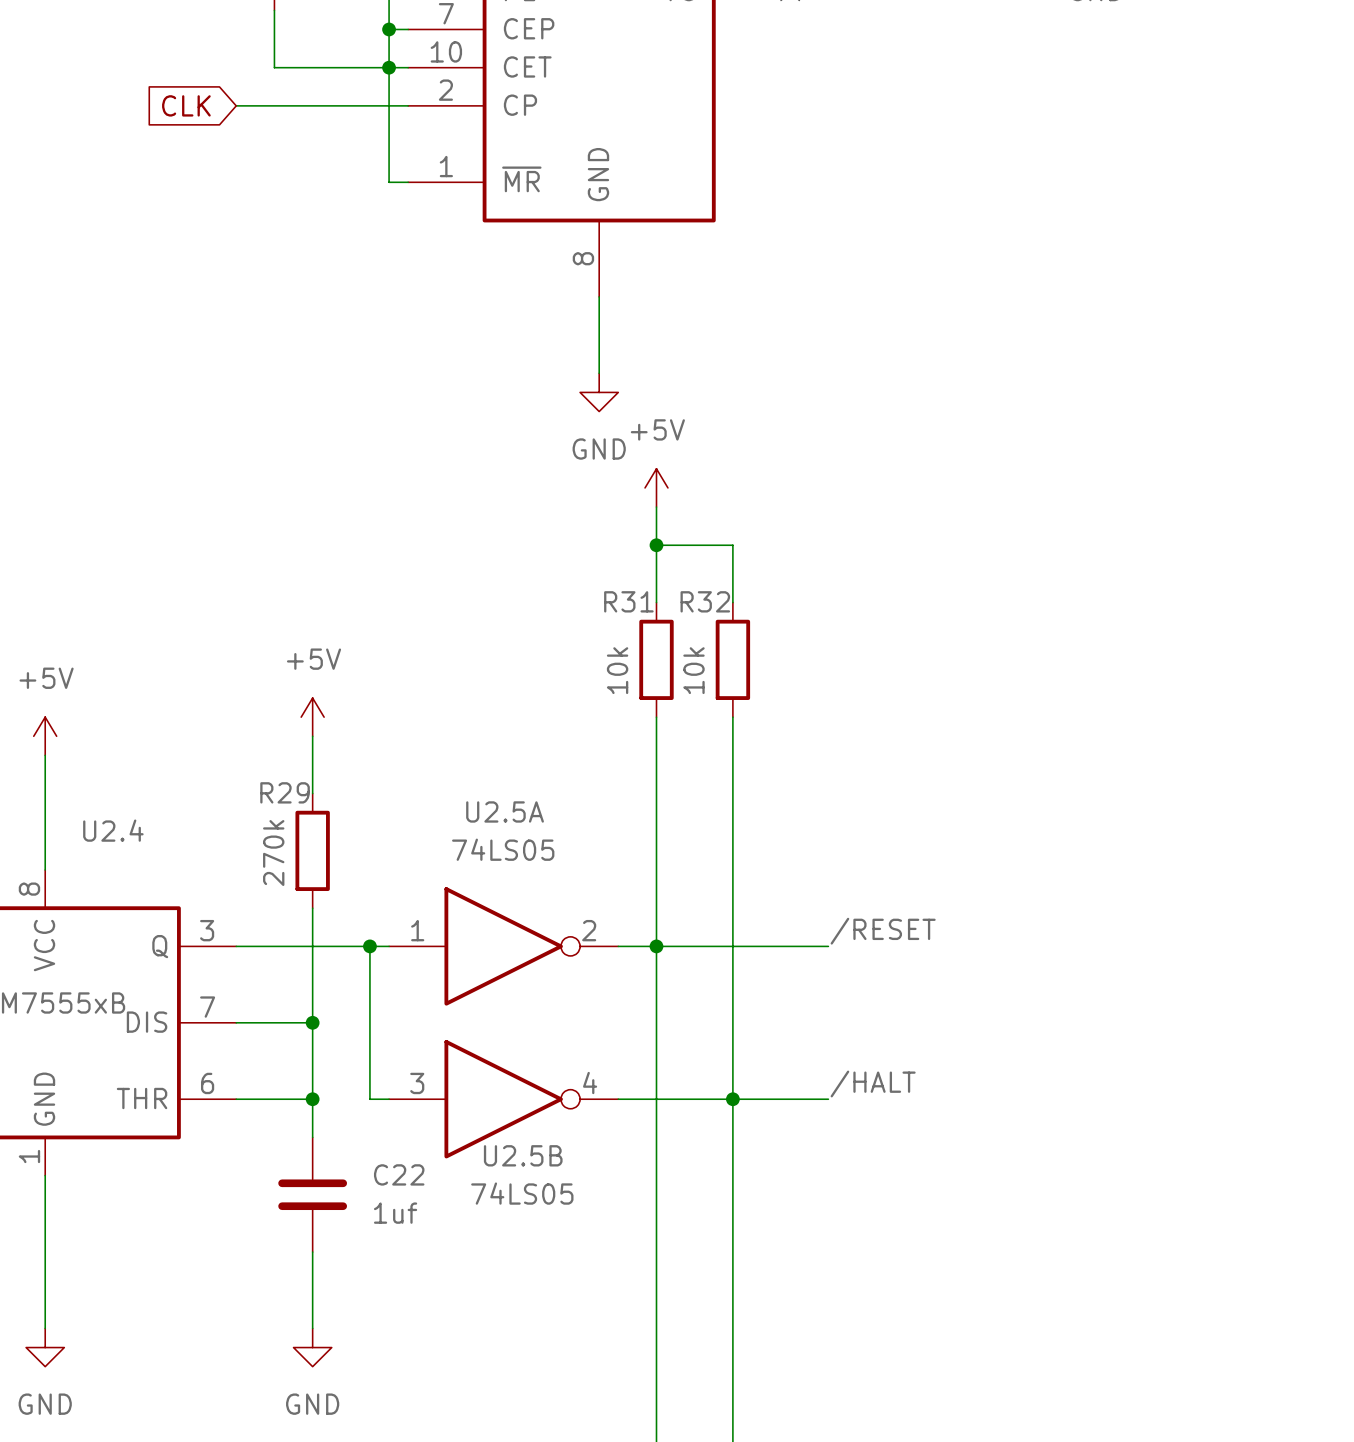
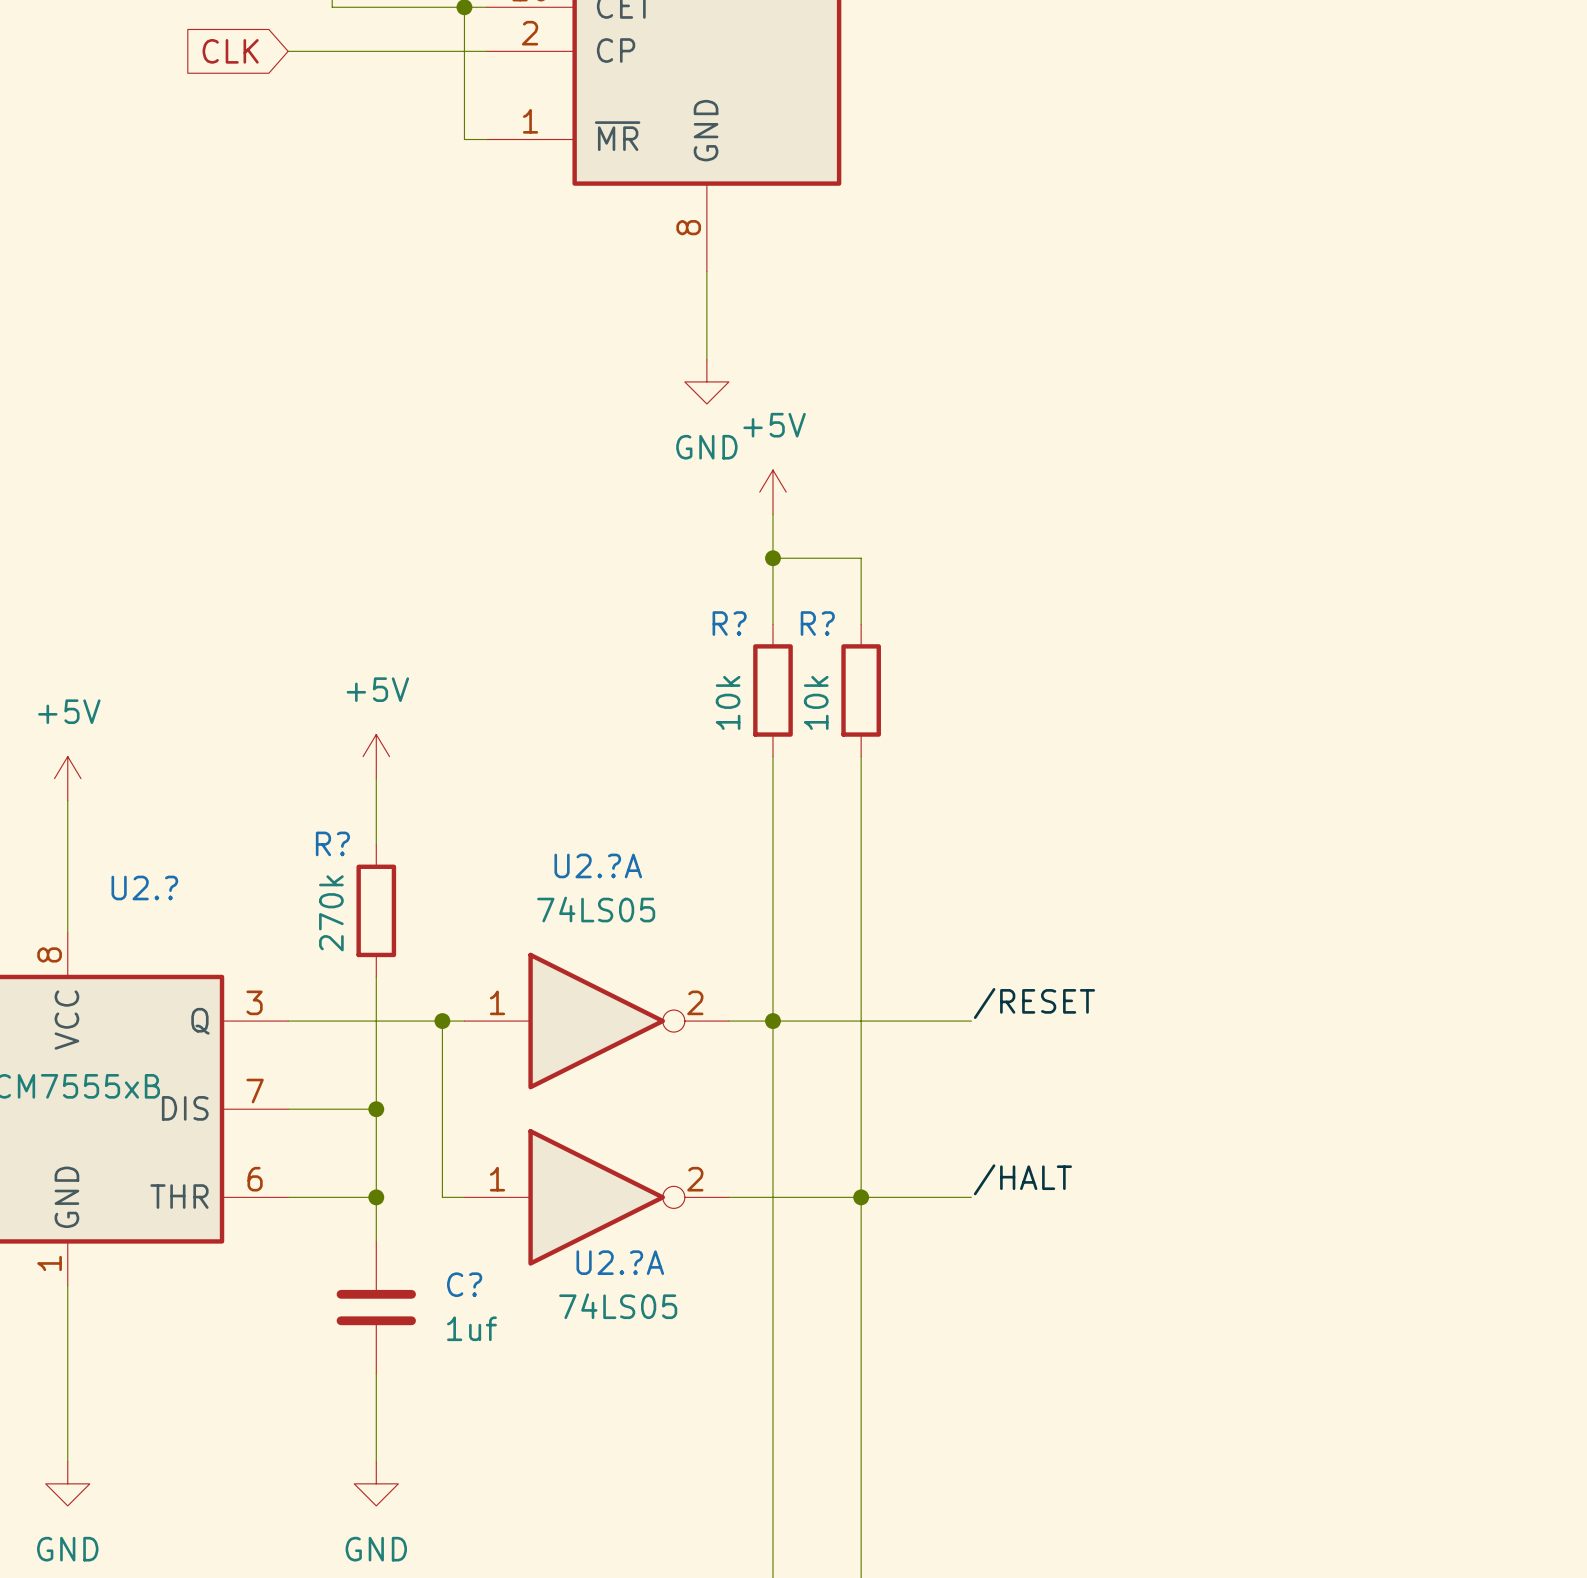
R31 name: R31 (628, 601) -> R? (729, 623)
R32 name: R32 (705, 601) -> R? (817, 623)
R29 name: R29 (285, 792) -> R? (332, 843)
U2.5A name: U2.5A (505, 811) -> U2.?A (598, 865)
U2.4 name: U2.4 (113, 830) -> U2.? (144, 888)
U2.5B pin number: 3 (417, 1083) -> 1 (497, 1179)
U2.5B pin number: 4 (590, 1083) -> 2 (695, 1179)
U2.5B name: U2.5B (523, 1155) -> U2.?A (620, 1262)
C22 name: C22 (399, 1174) -> C? (464, 1284)

